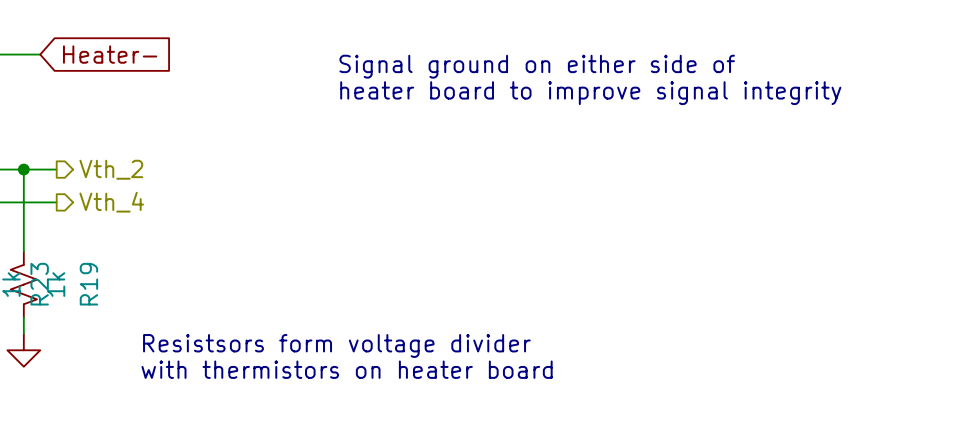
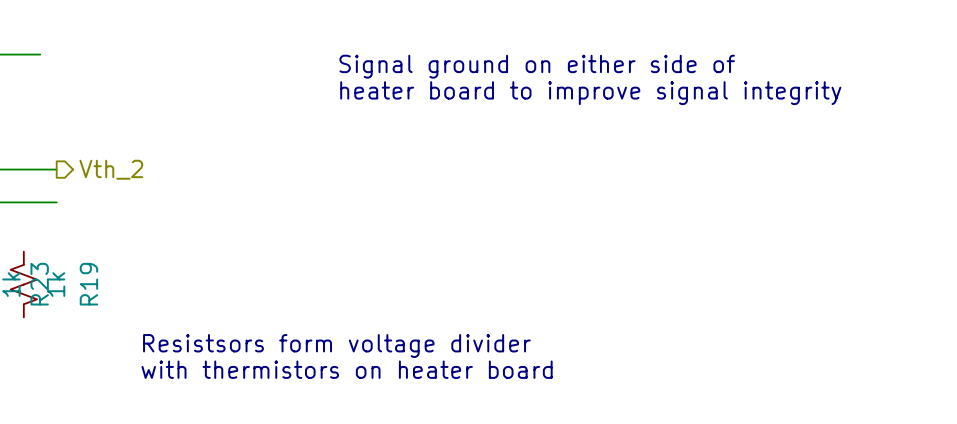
global label: Heater- (110, 54) -> none
wire: (23, 169) (23, 251) -> none
junction: (23, 169) -> none
hierarchical label: Vth_4 (111, 202) -> none
wire: (23, 317) (23, 333) -> none
power symbol: (23, 350) -> none

